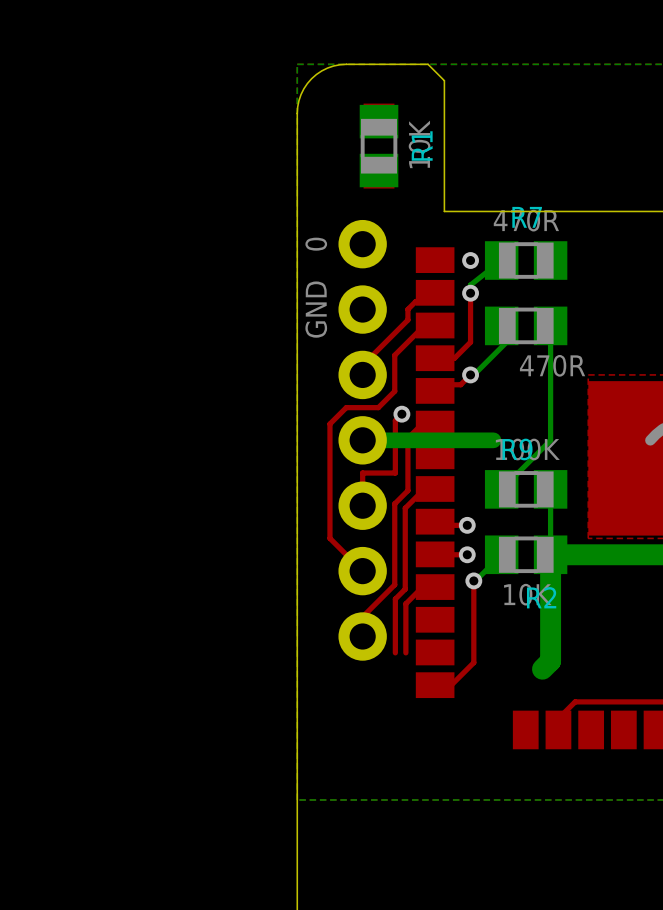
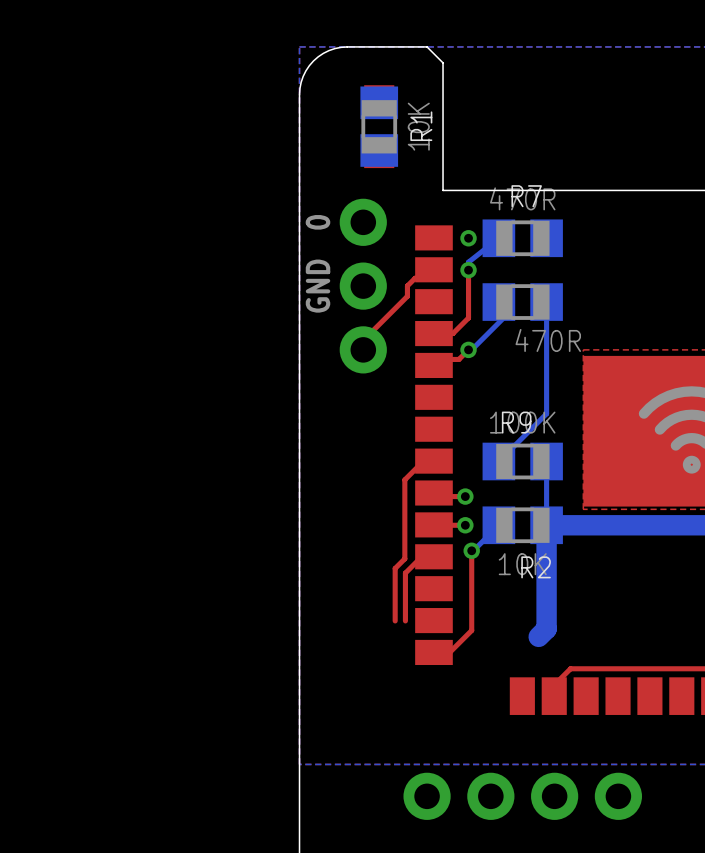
top track: (435, 325) (424, 325) (394, 355) (394, 391) (378, 407) (346, 407) (329, 423) (329, 538) (362, 571) -> none
top track: (401, 414) (395, 420) (395, 473) (362, 473) (362, 505) -> none
via: (401, 414) -> none
top track: (435, 423) (422, 423) (407, 438) (407, 490) (394, 503) (394, 584) (362, 616) -> none
bottom track: (493, 440) (362, 440) -> none
part rotation: 0° (362, 538) -> 90° clockwise (522, 796)
part position: (362, 538) -> (522, 796)

